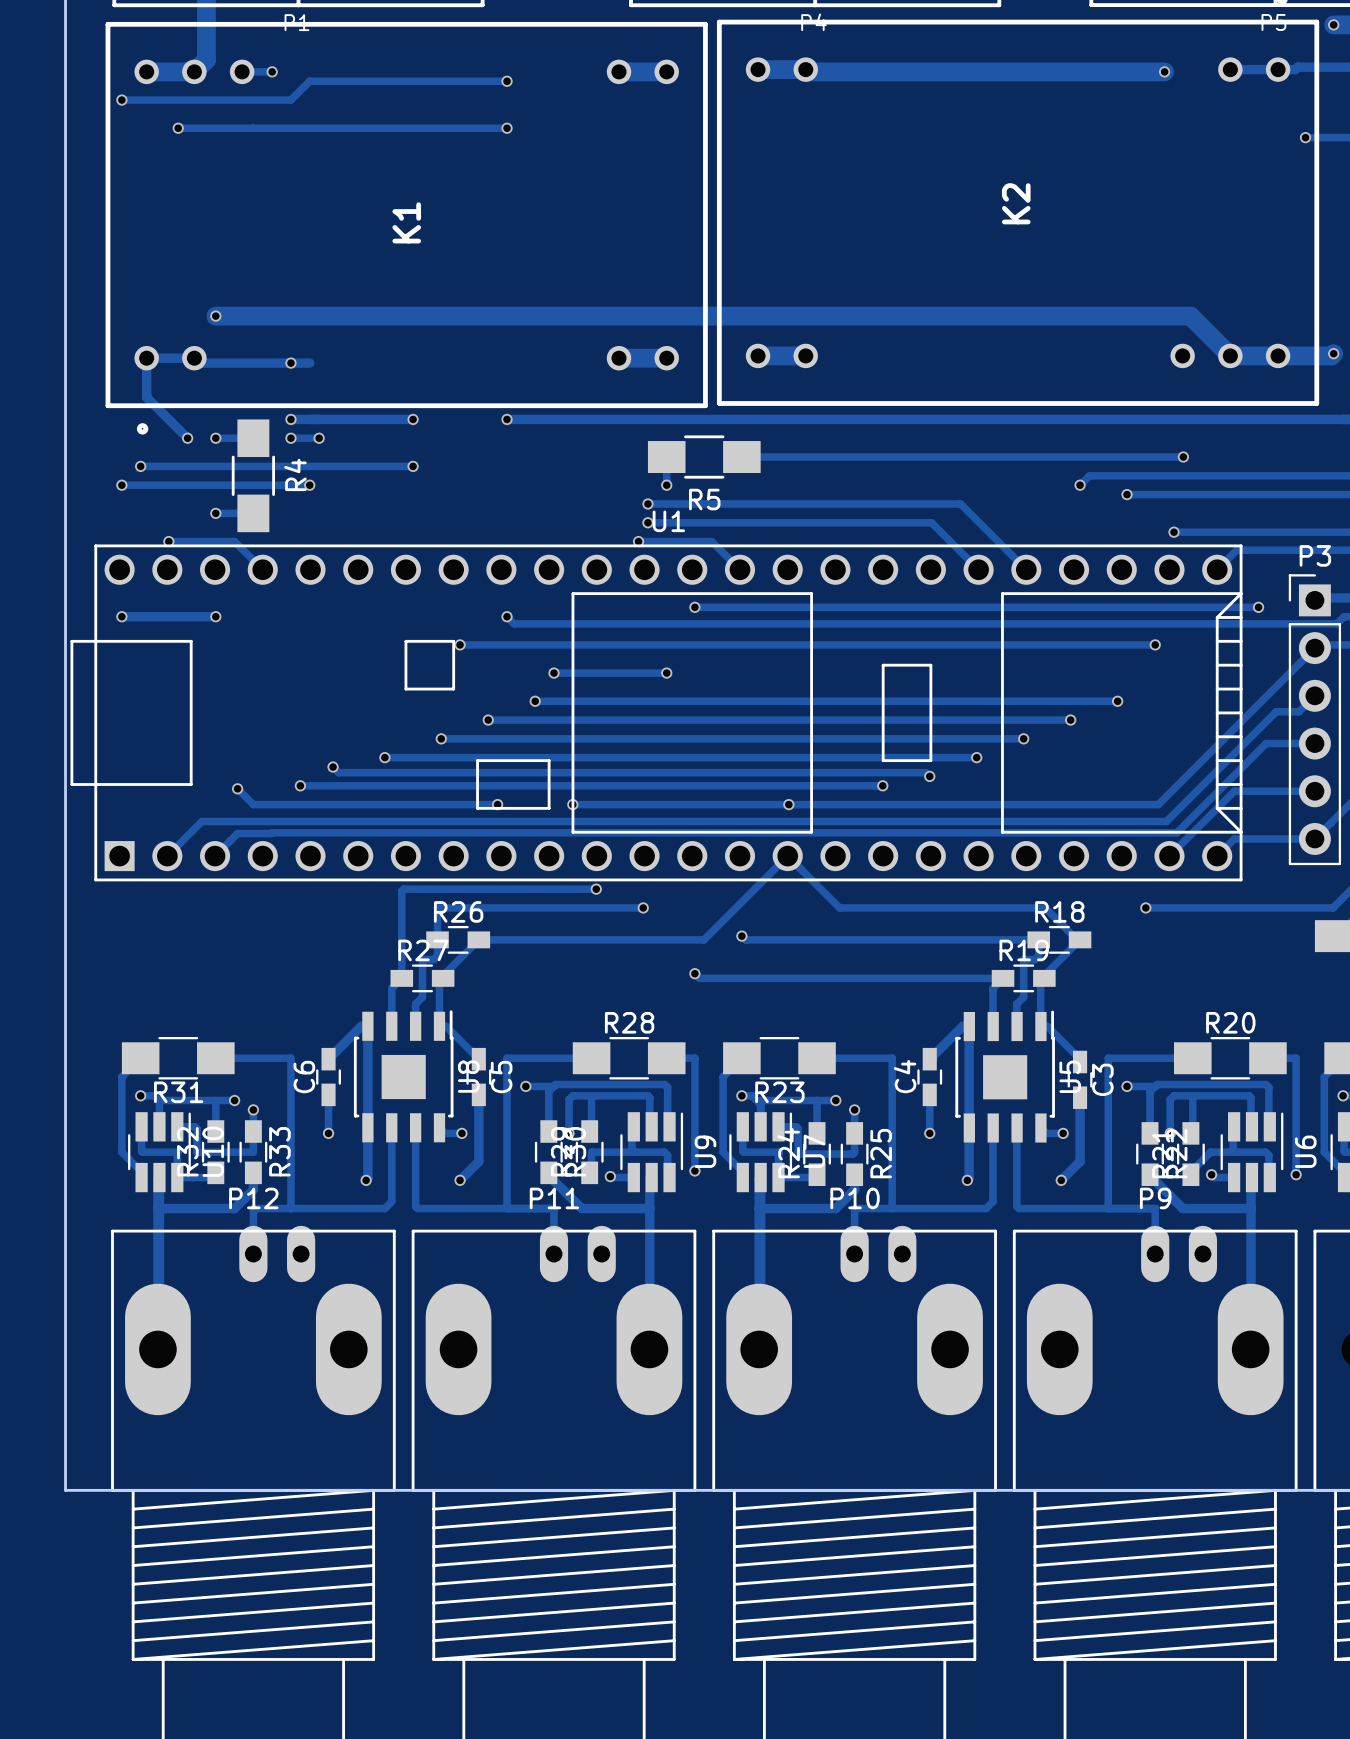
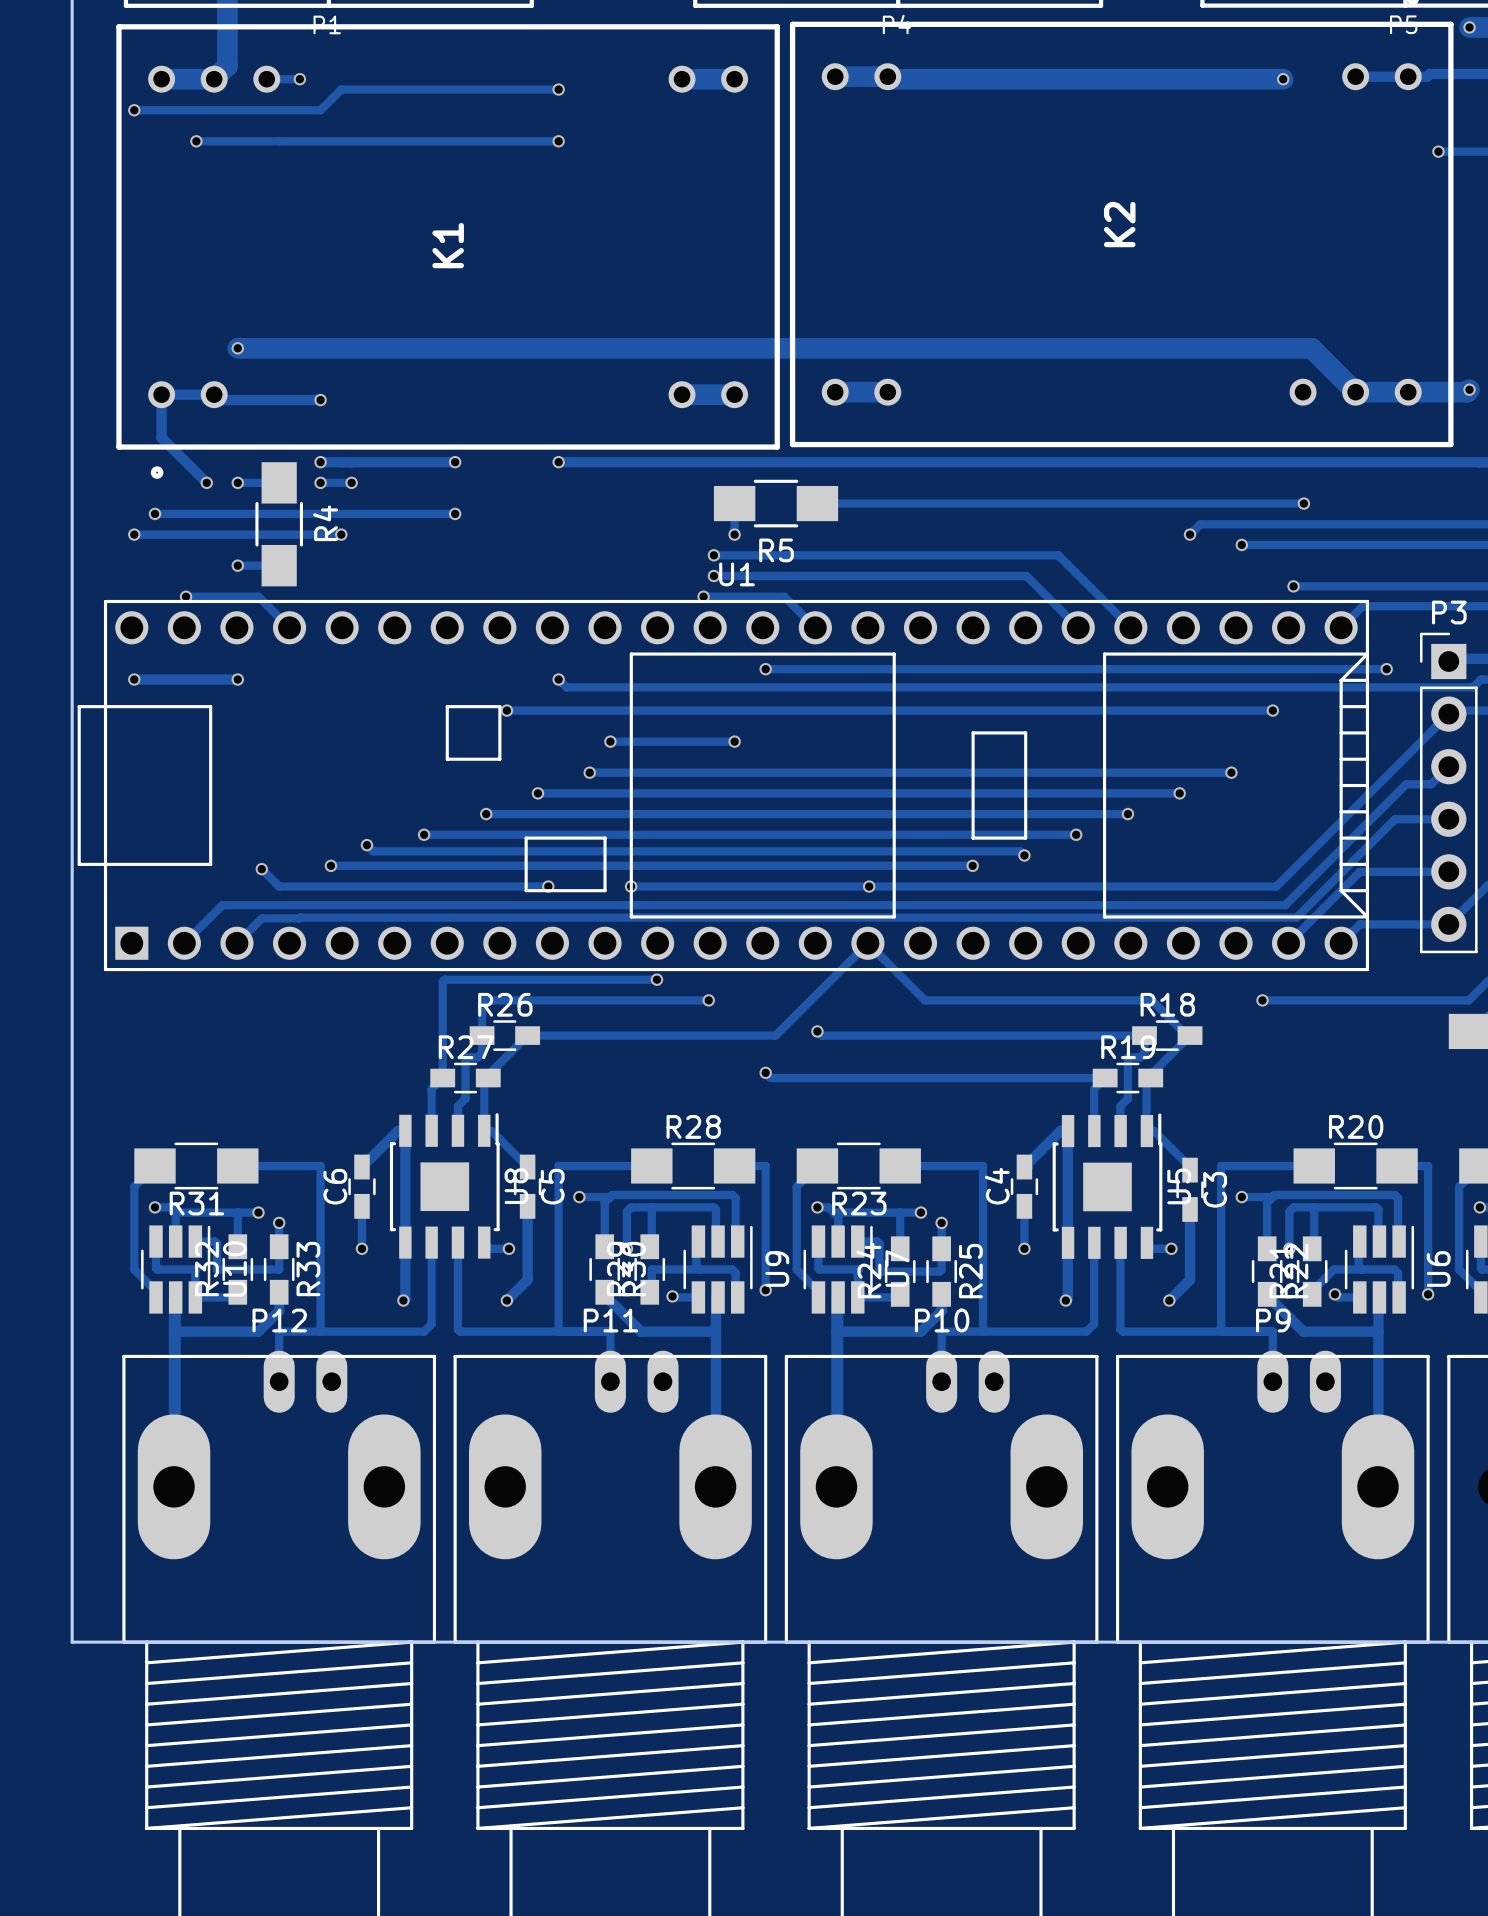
track: (290, 363) (309, 363) -> none

